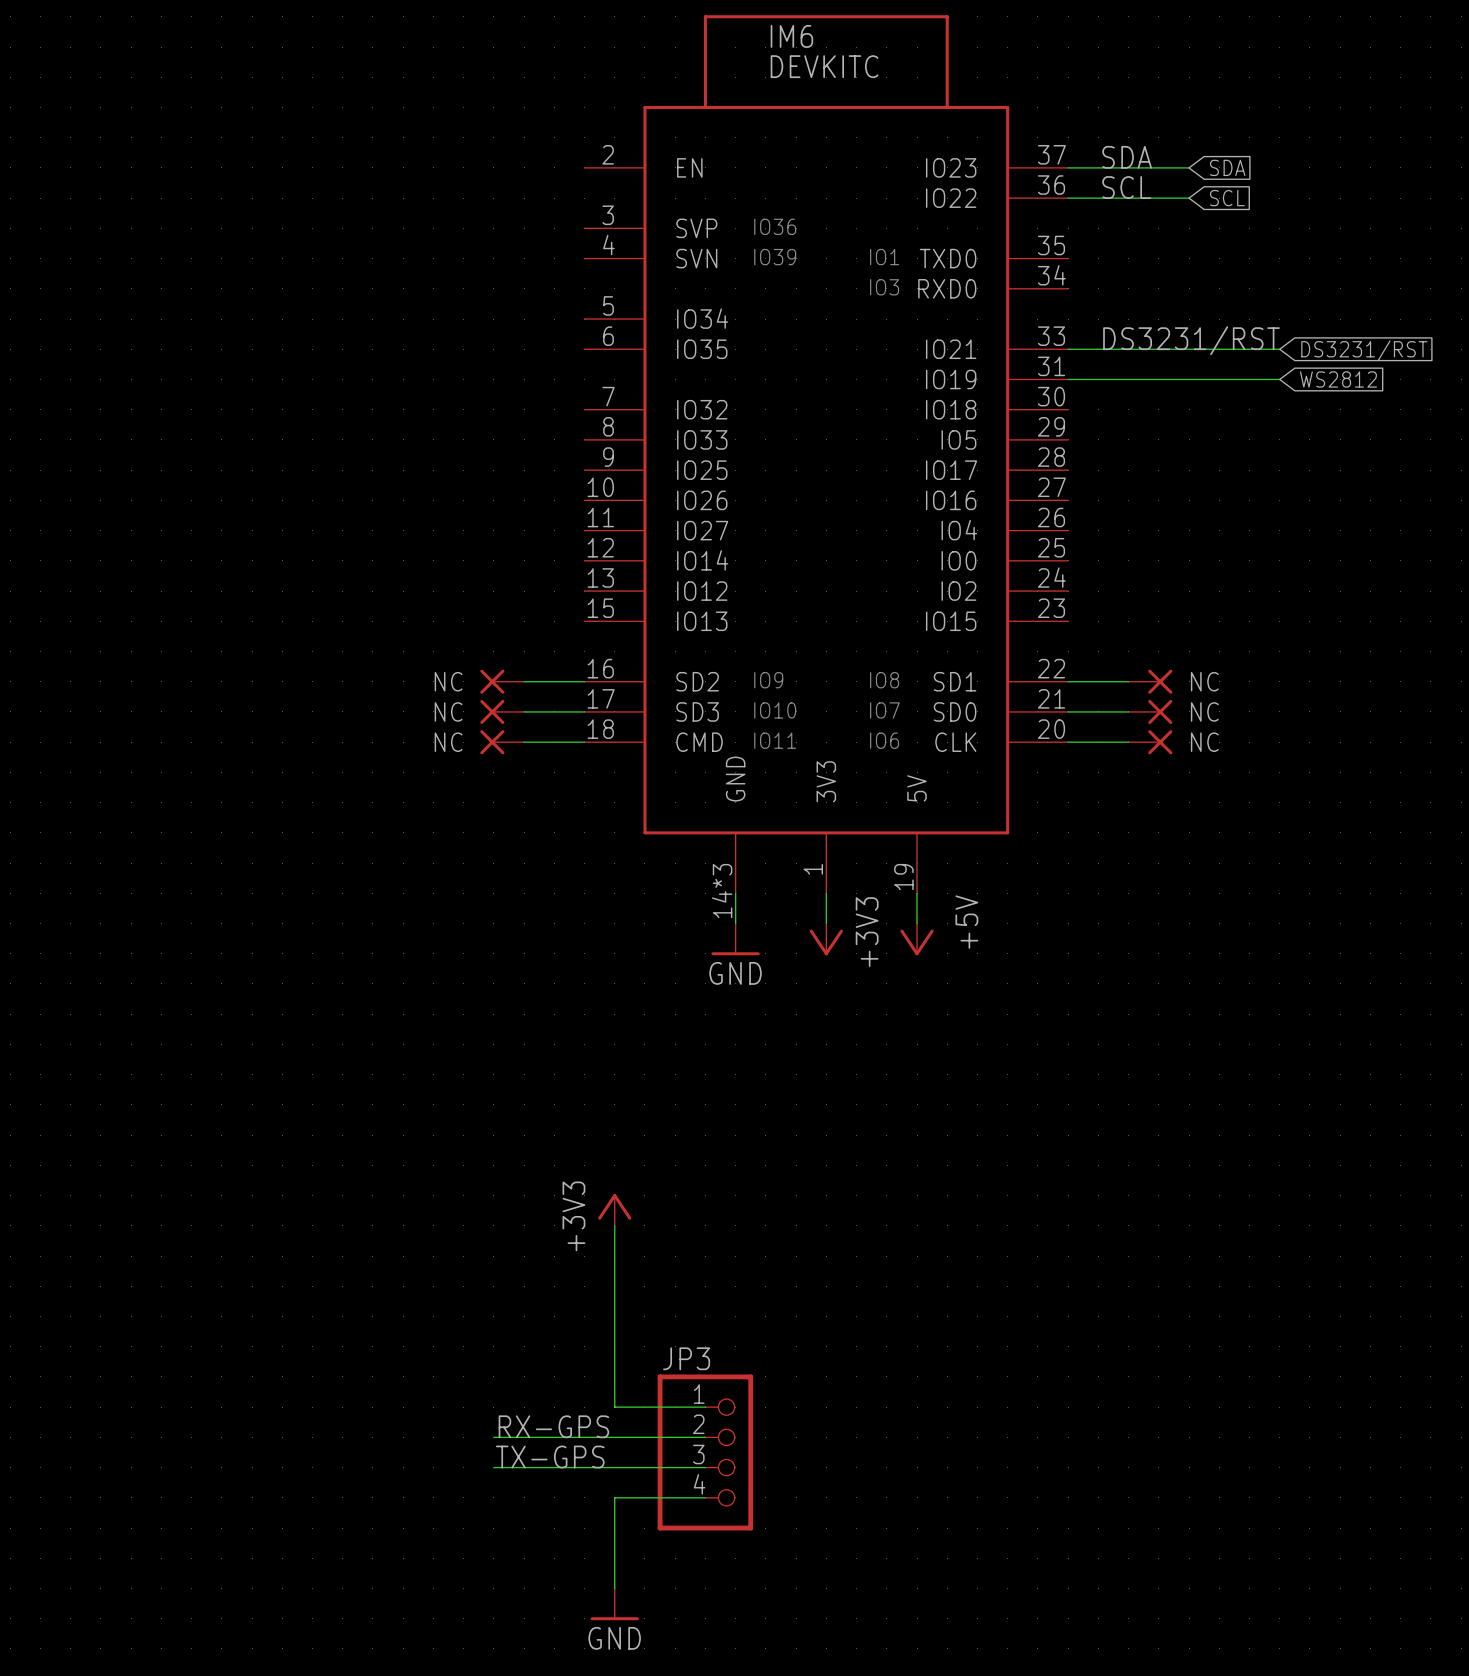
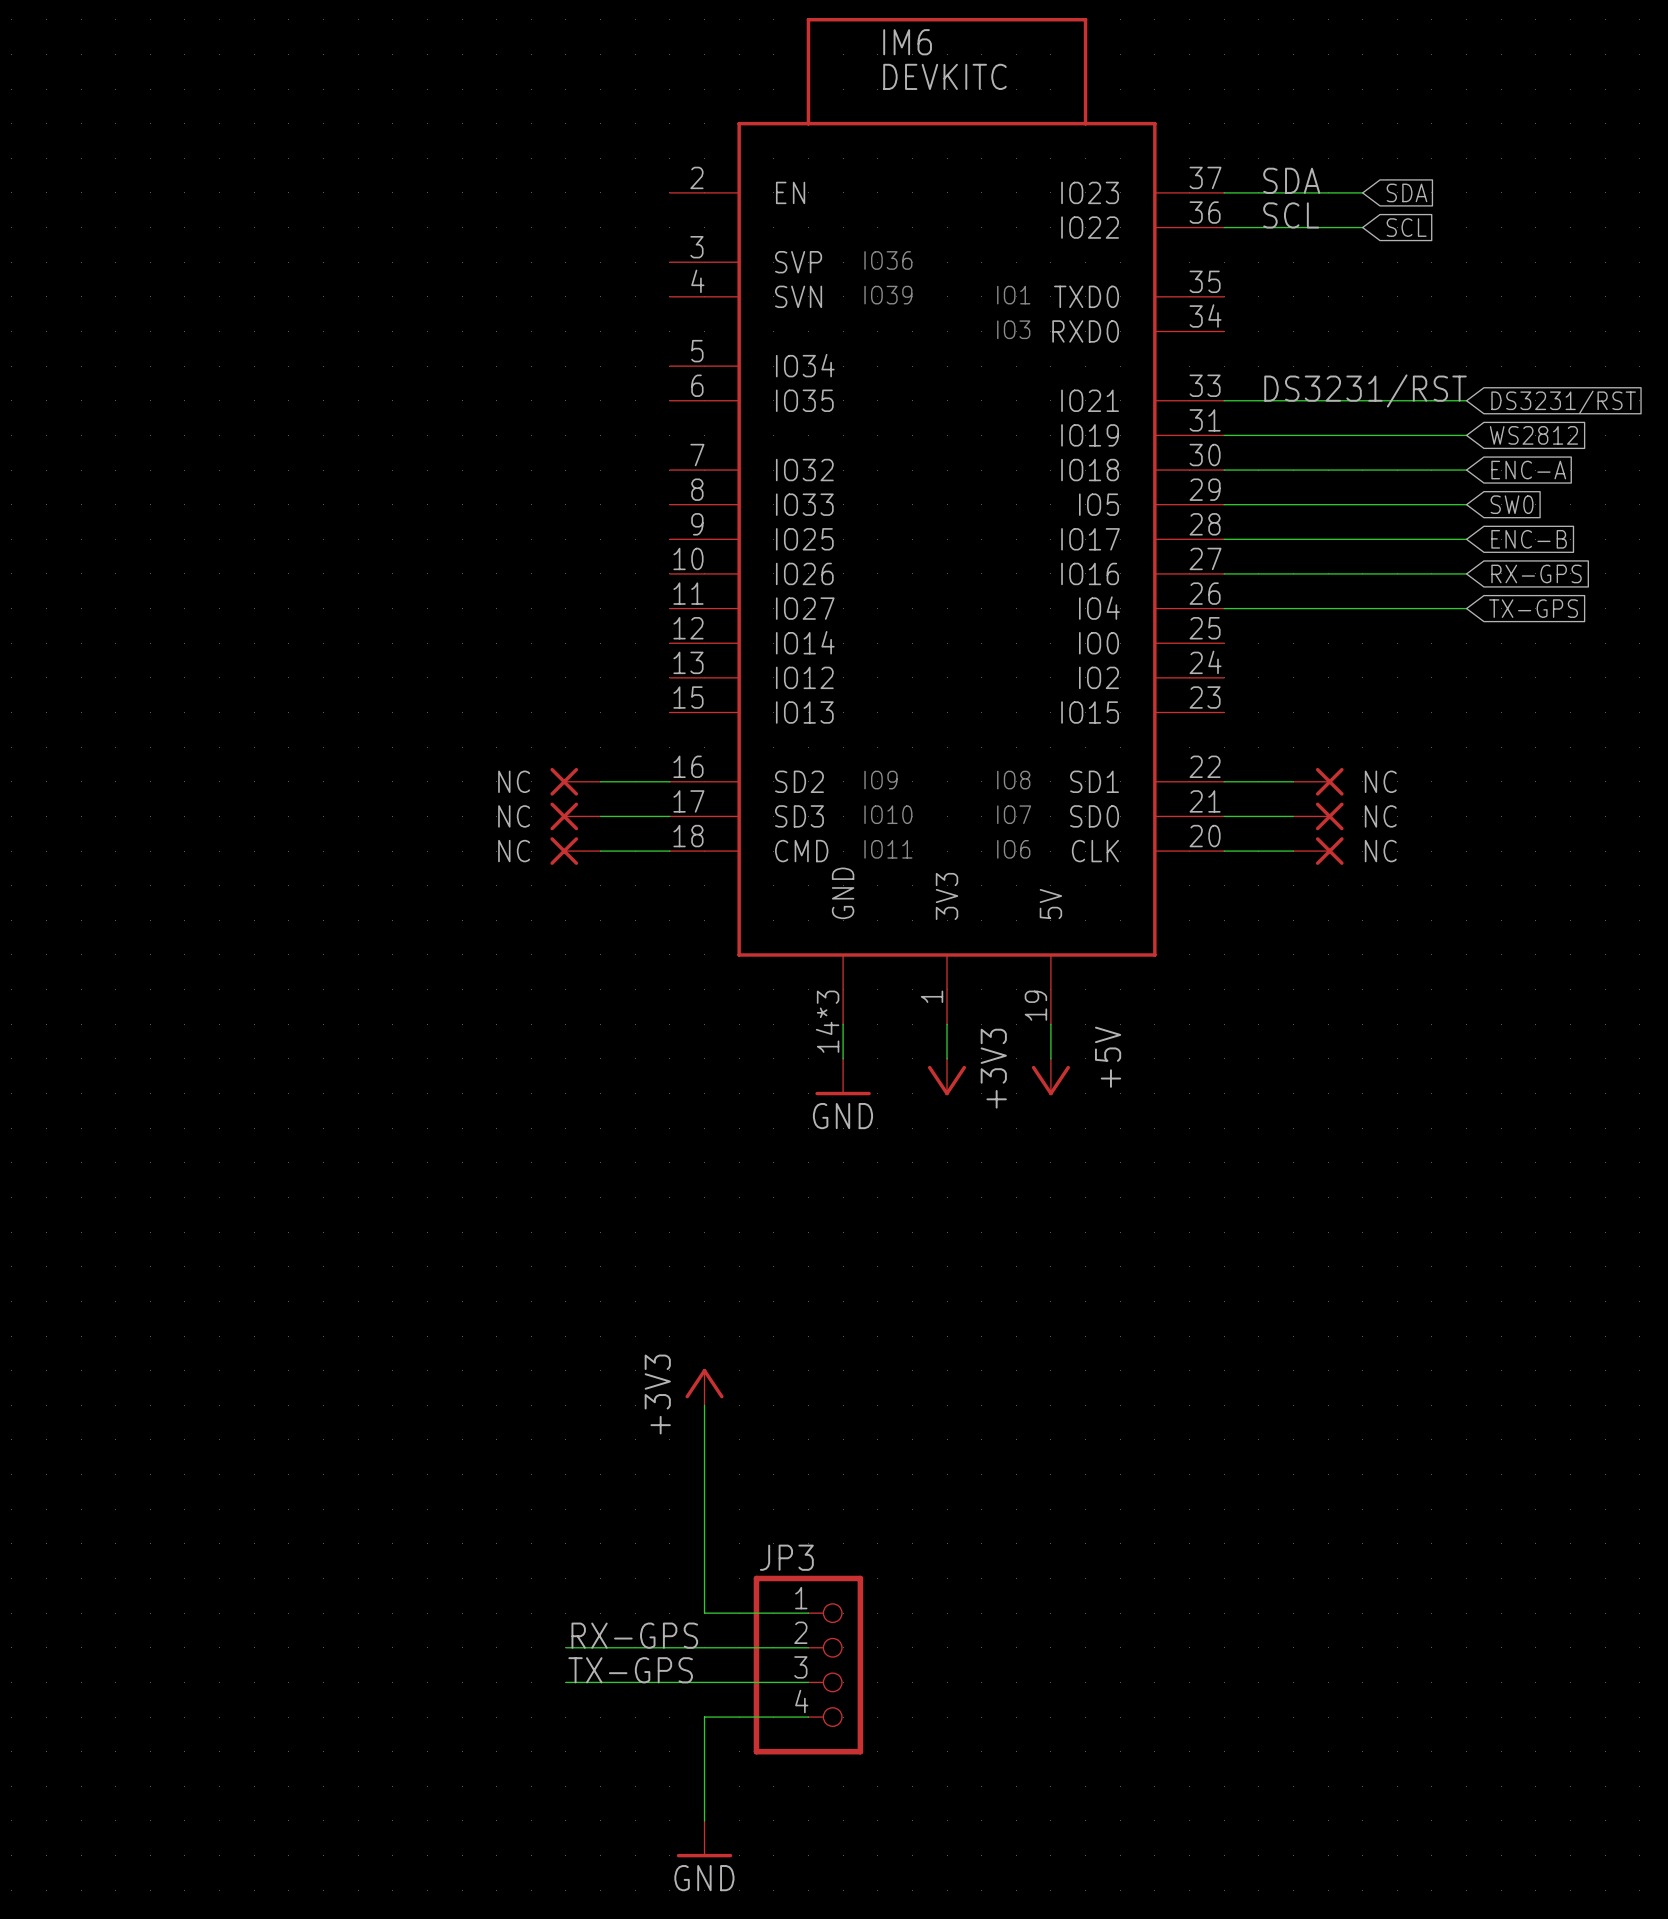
wire: none -> (1224, 470) (1466, 470)
global label: none -> ENC-A (1528, 470)
wire: none -> (1224, 504) (1466, 504)
global label: none -> SW0 (1512, 504)
wire: none -> (1224, 539) (1466, 539)
global label: none -> ENC-B (1529, 539)
wire: none -> (1224, 573) (1466, 573)
global label: none -> RX-GPS (1536, 573)
wire: none -> (1224, 608) (1466, 608)
global label: none -> TX-GPS (1533, 608)

